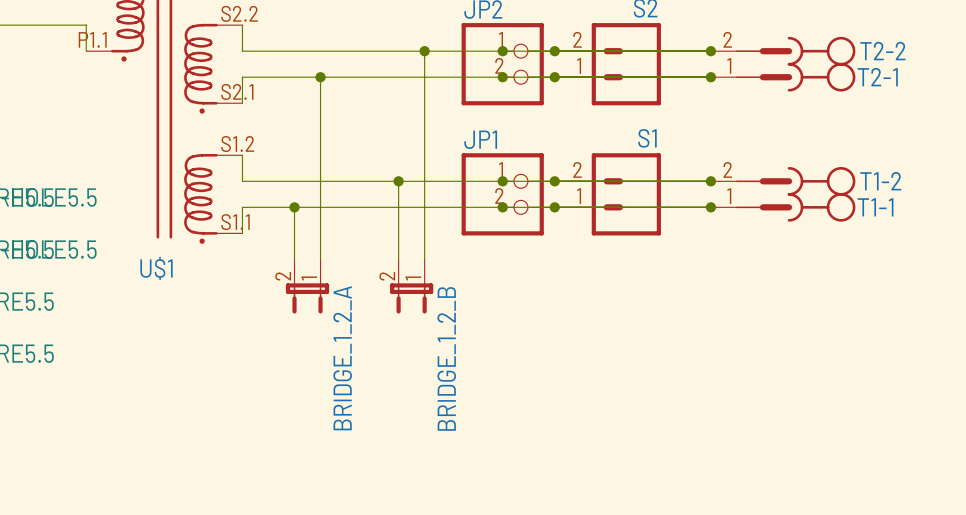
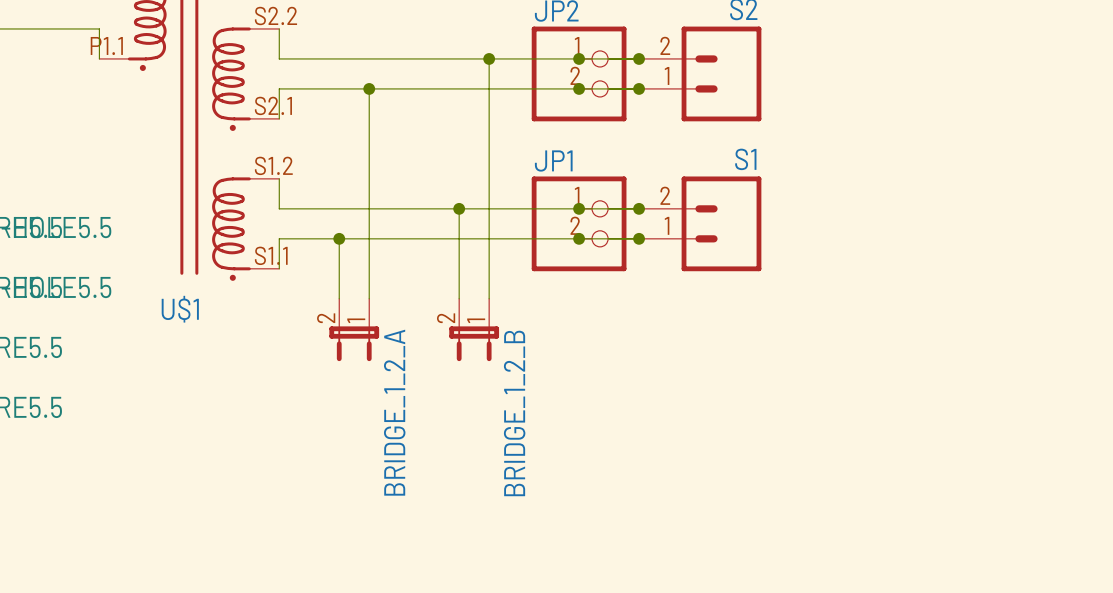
wire: (554, 51) (710, 51) -> none
junction: (710, 51) -> none
T2-2: (783, 51) -> none
wire: (554, 77) (710, 77) -> none
junction: (710, 77) -> none
T2-1: (783, 77) -> none
wire: (554, 181) (710, 181) -> none
junction: (710, 181) -> none
T1-2: (783, 181) -> none
wire: (554, 207) (710, 207) -> none
junction: (710, 207) -> none
T1-1: (783, 207) -> none

